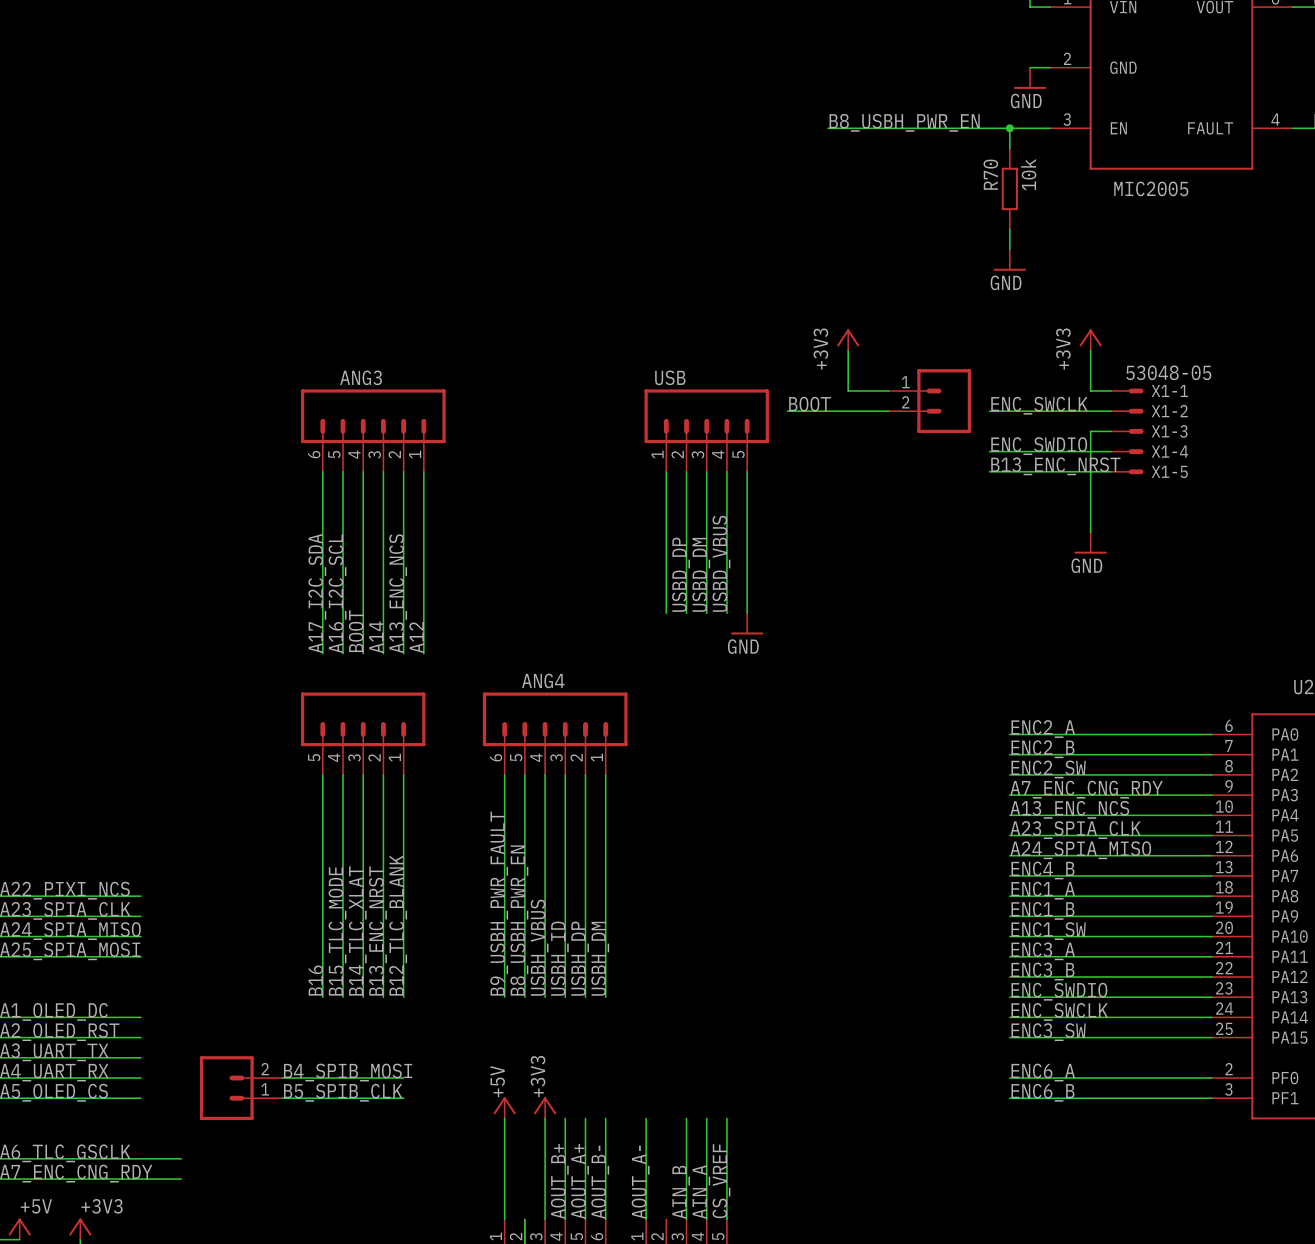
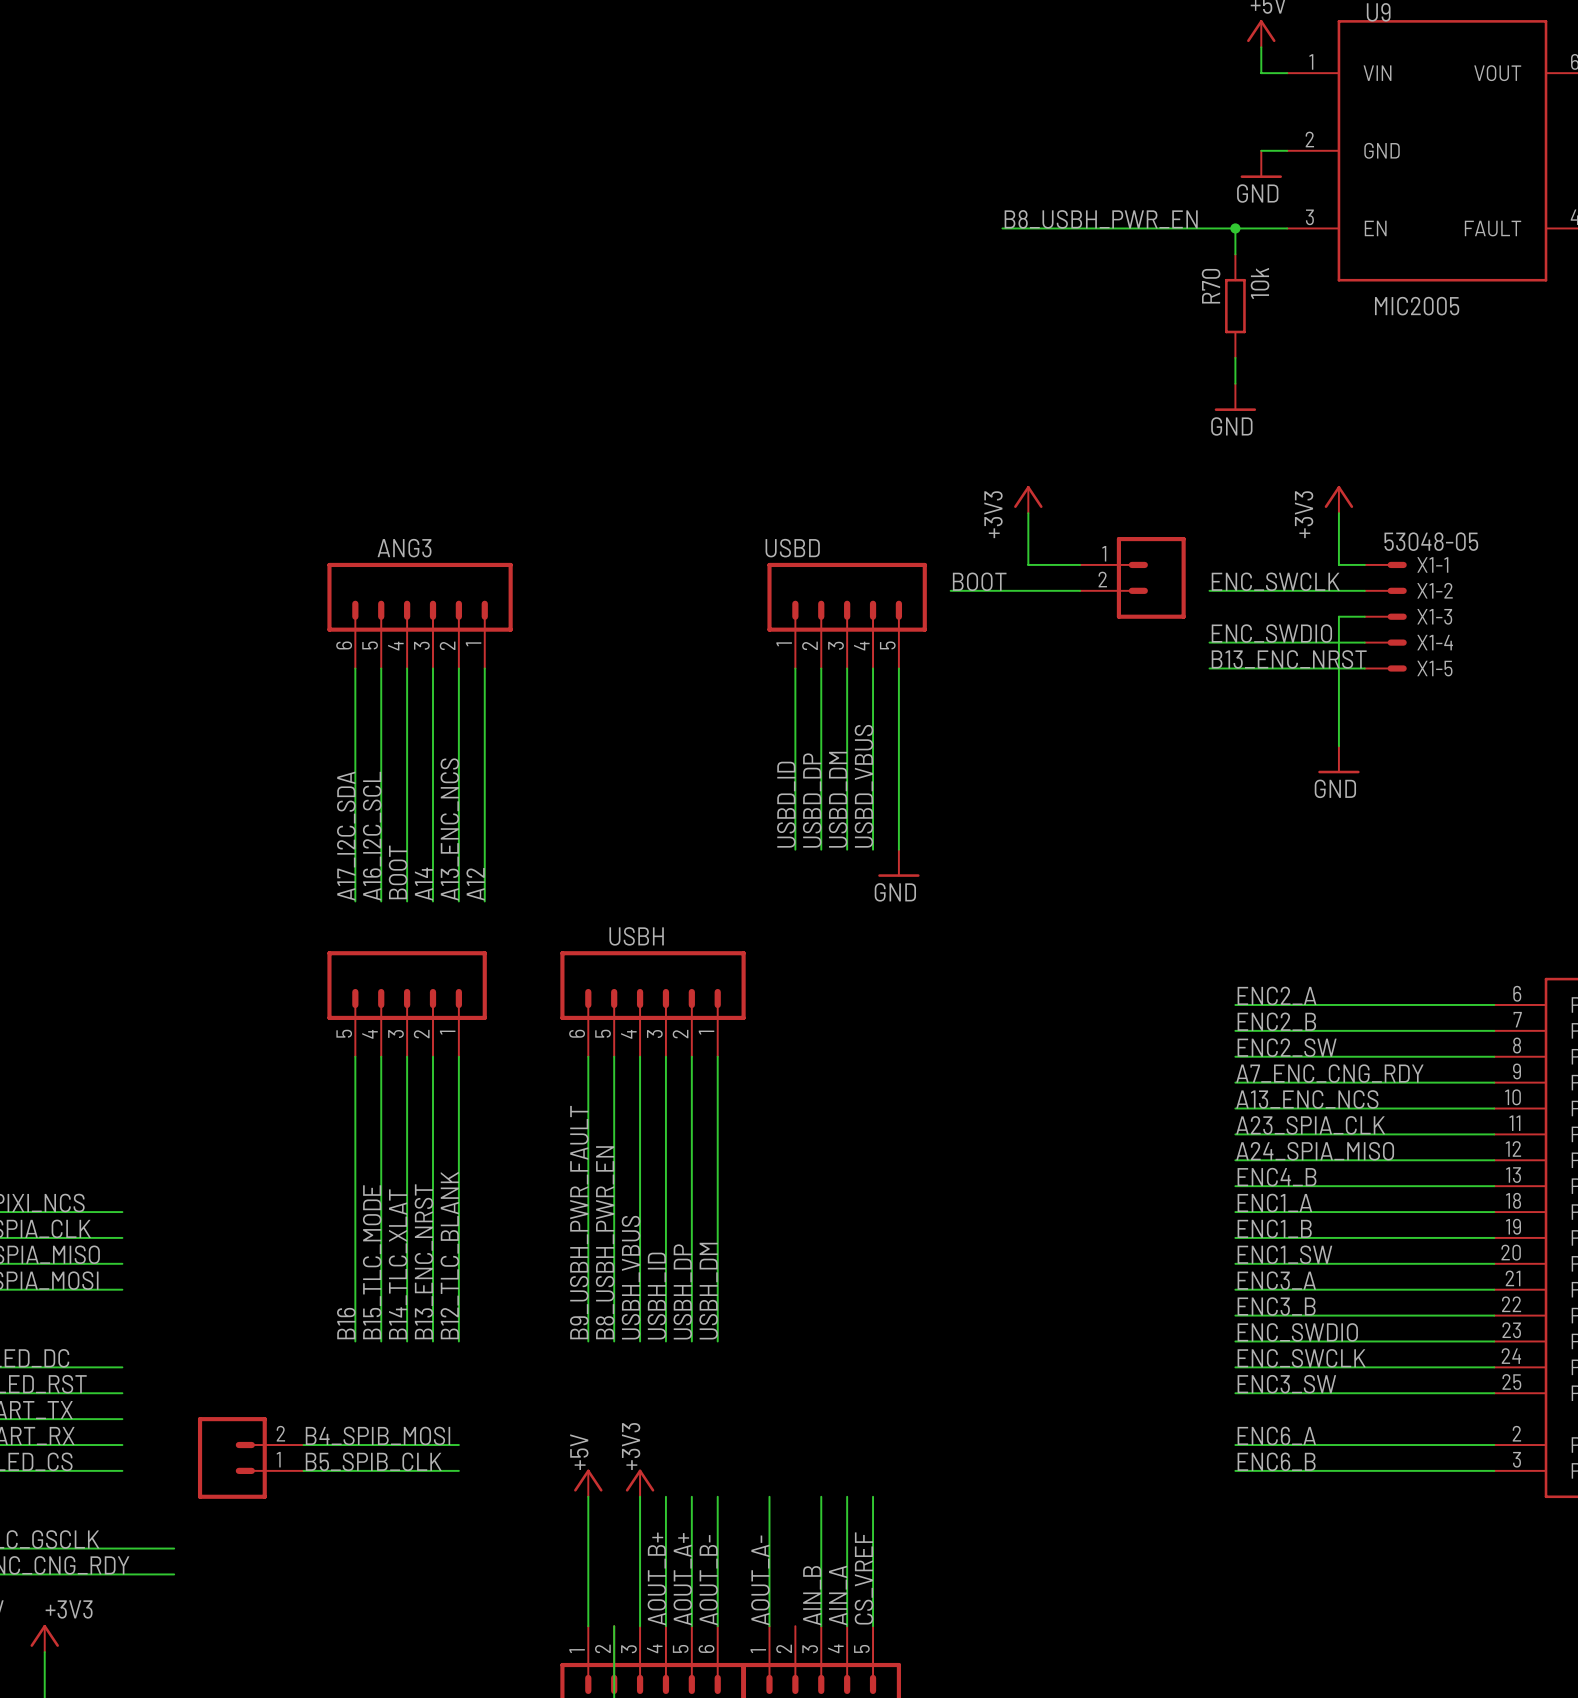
USB name: USB (670, 377) -> USBD (792, 548)
label: none -> USBD_ID (786, 804)
ANG4 name: ANG4 (543, 680) -> USBH (636, 936)

